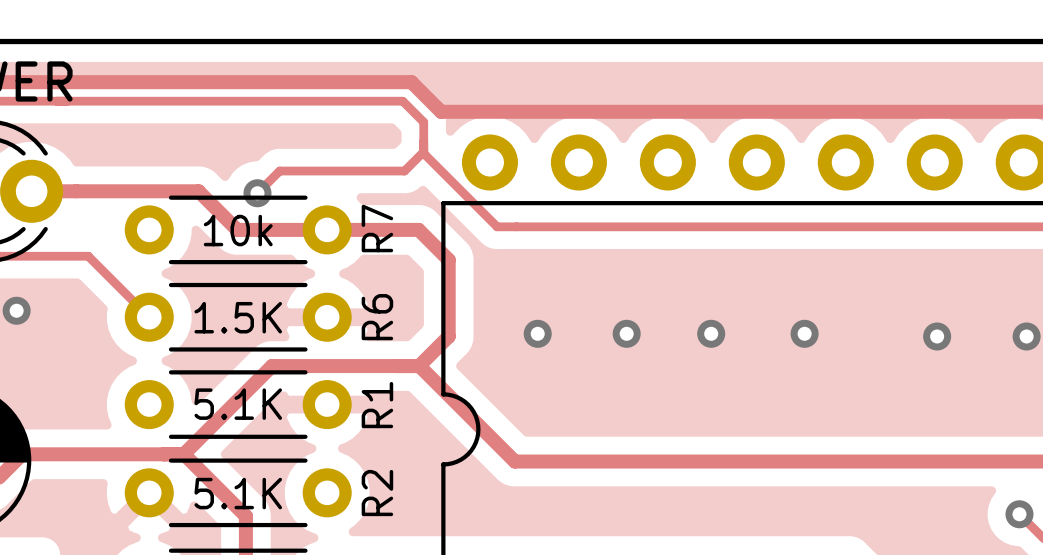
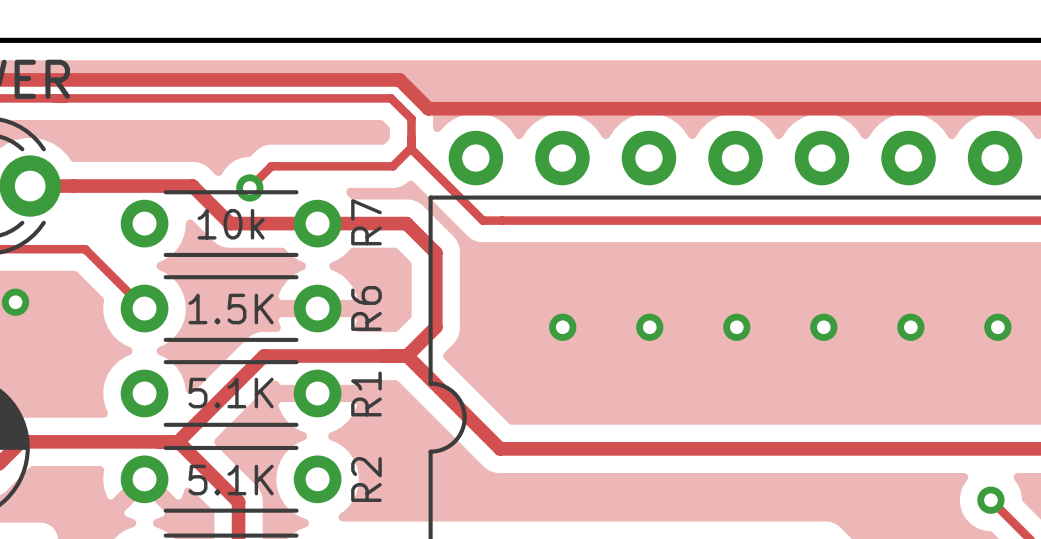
via: (537, 333) -> none
via: (626, 333) -> none
via: (711, 333) -> none
via: (804, 333) -> none
via: none -> (562, 327)
via: none -> (649, 327)
via: none -> (736, 327)
via: none -> (823, 327)

